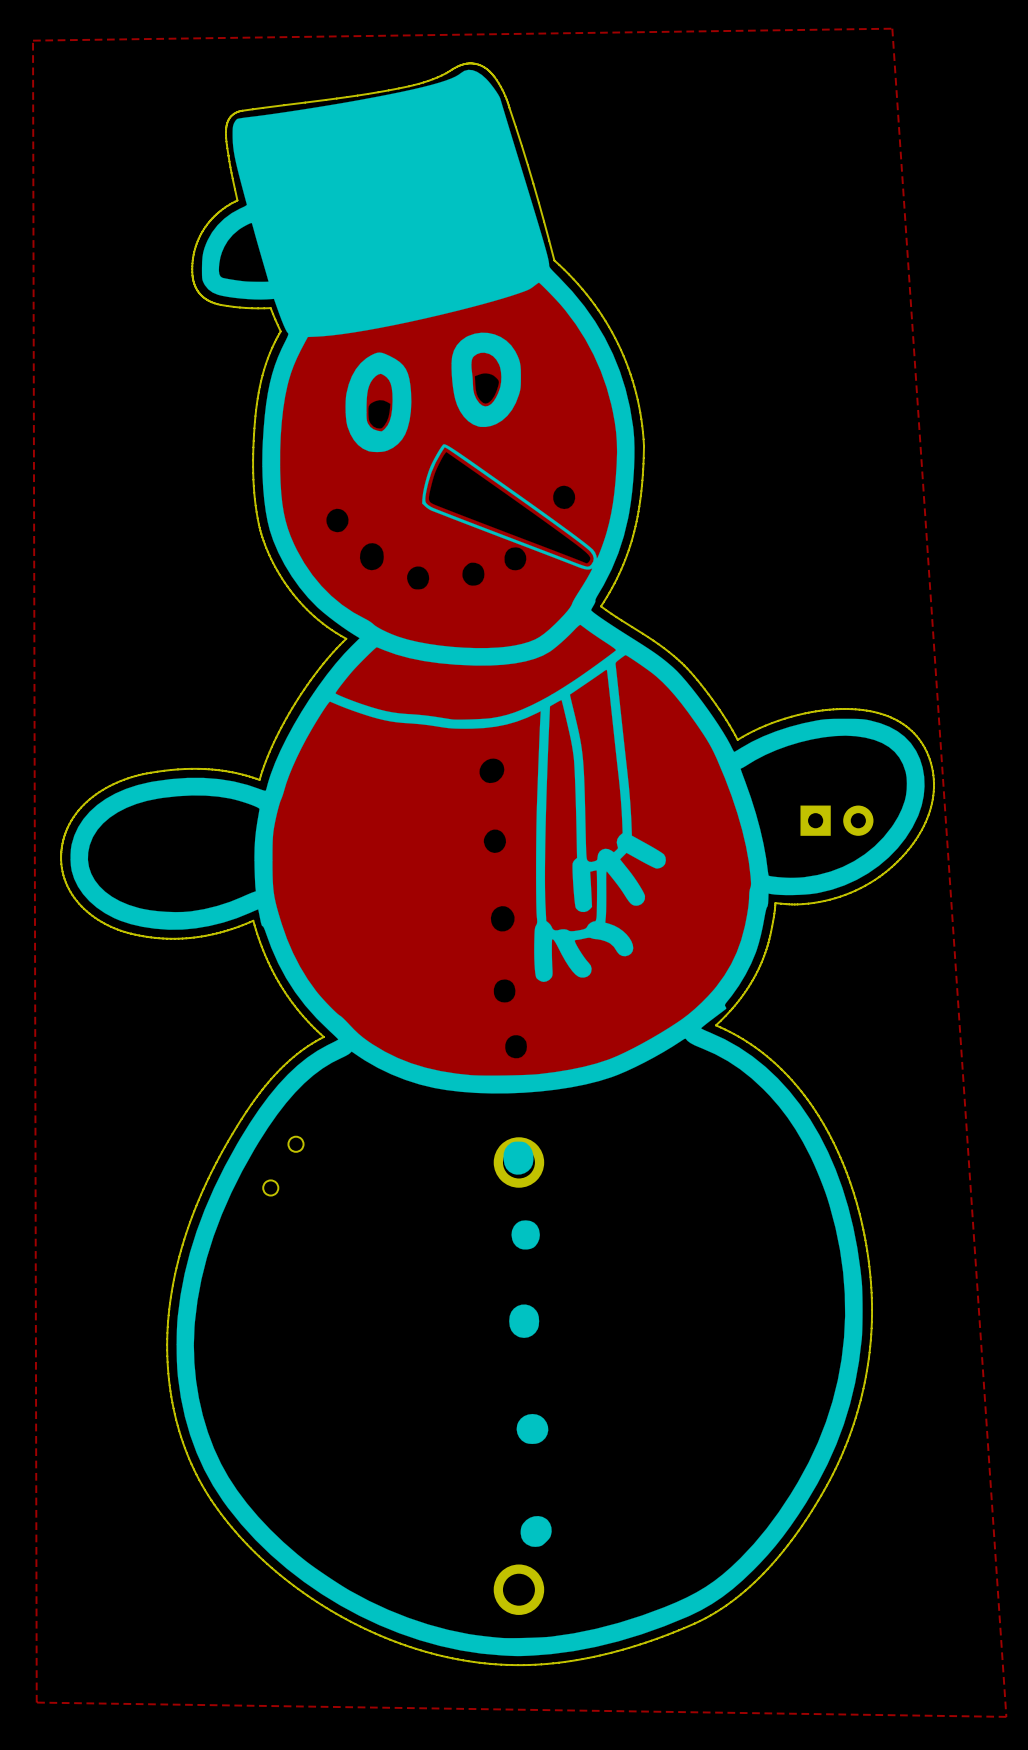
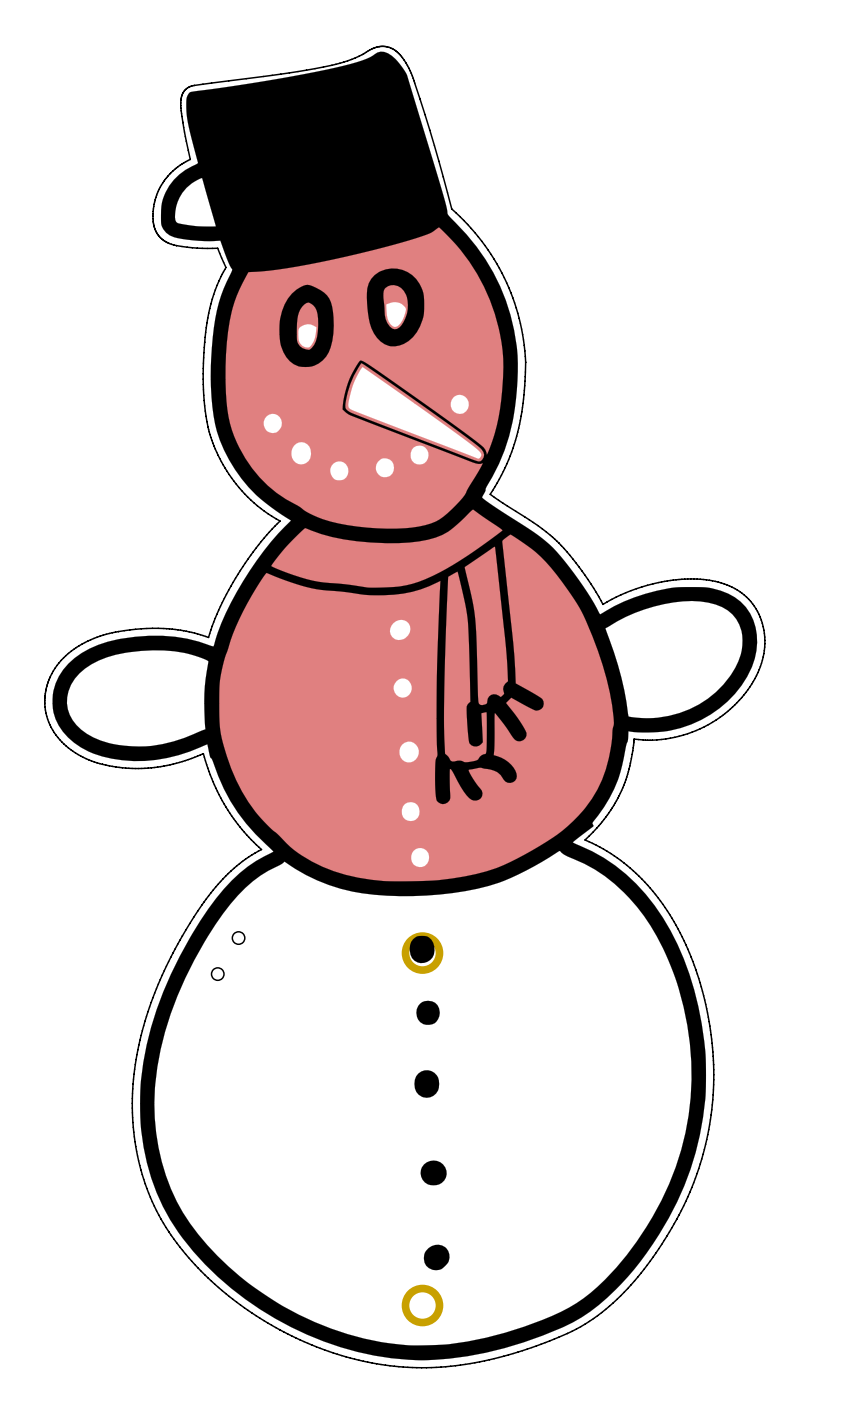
zone outline: (892, 28) (33, 40) (36, 1702) (1006, 1716) (892, 28) -> none
part: (836, 820) -> none

